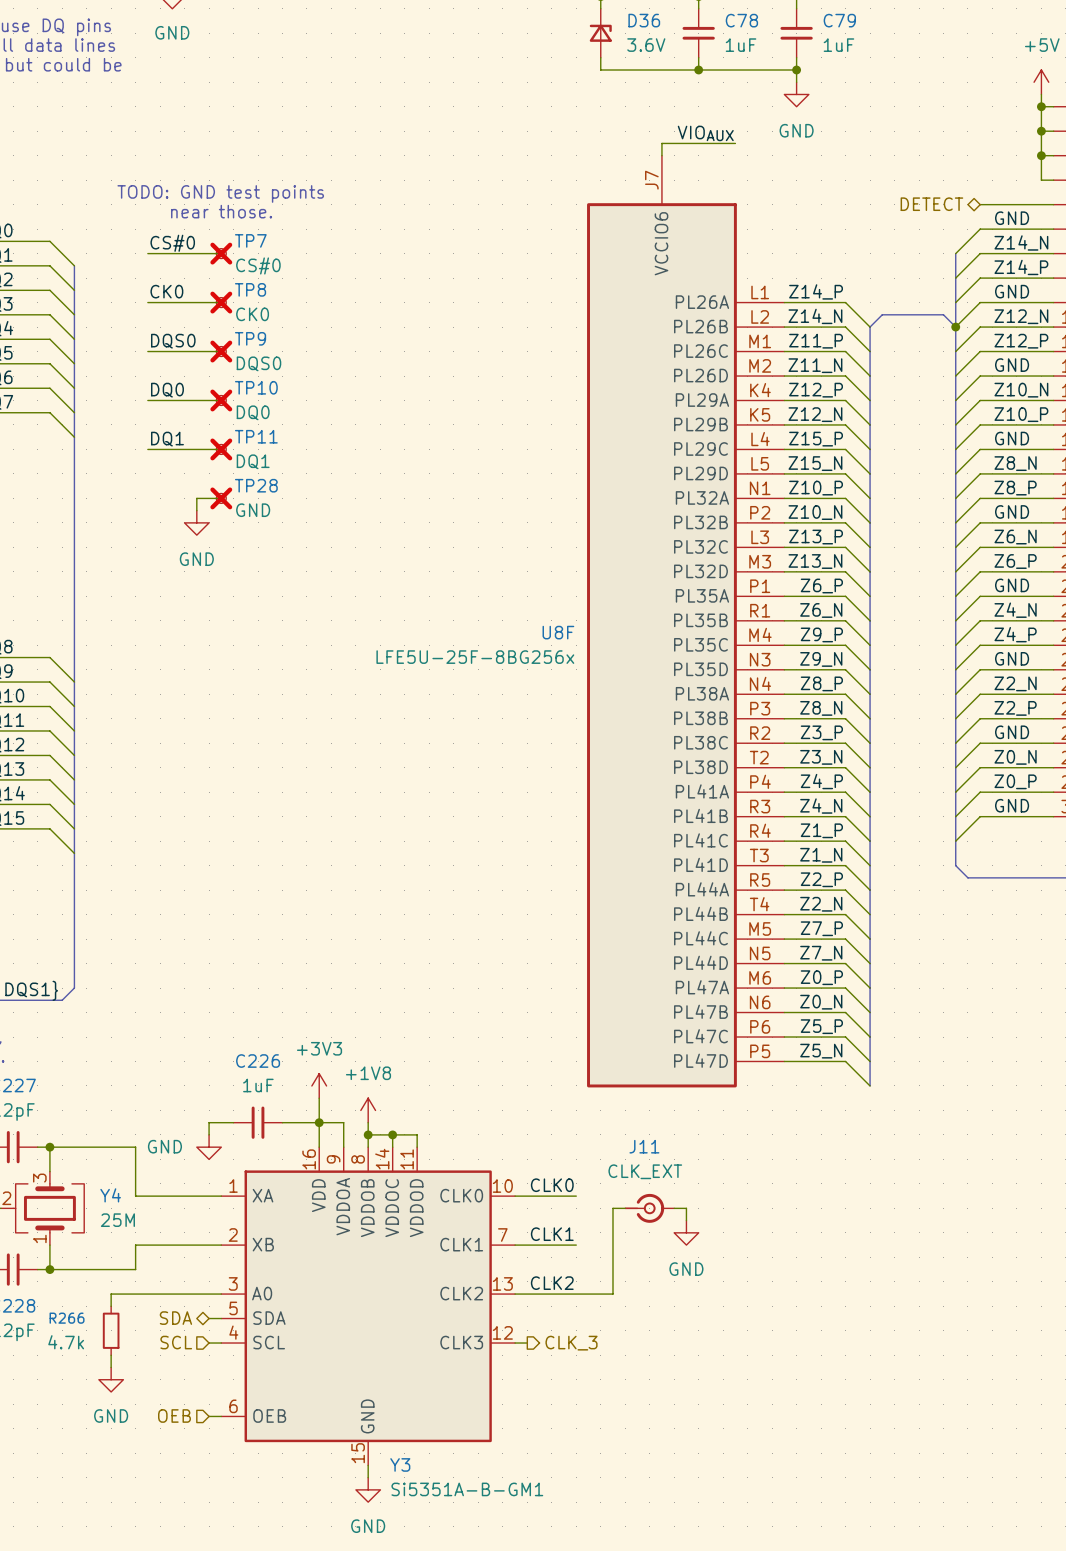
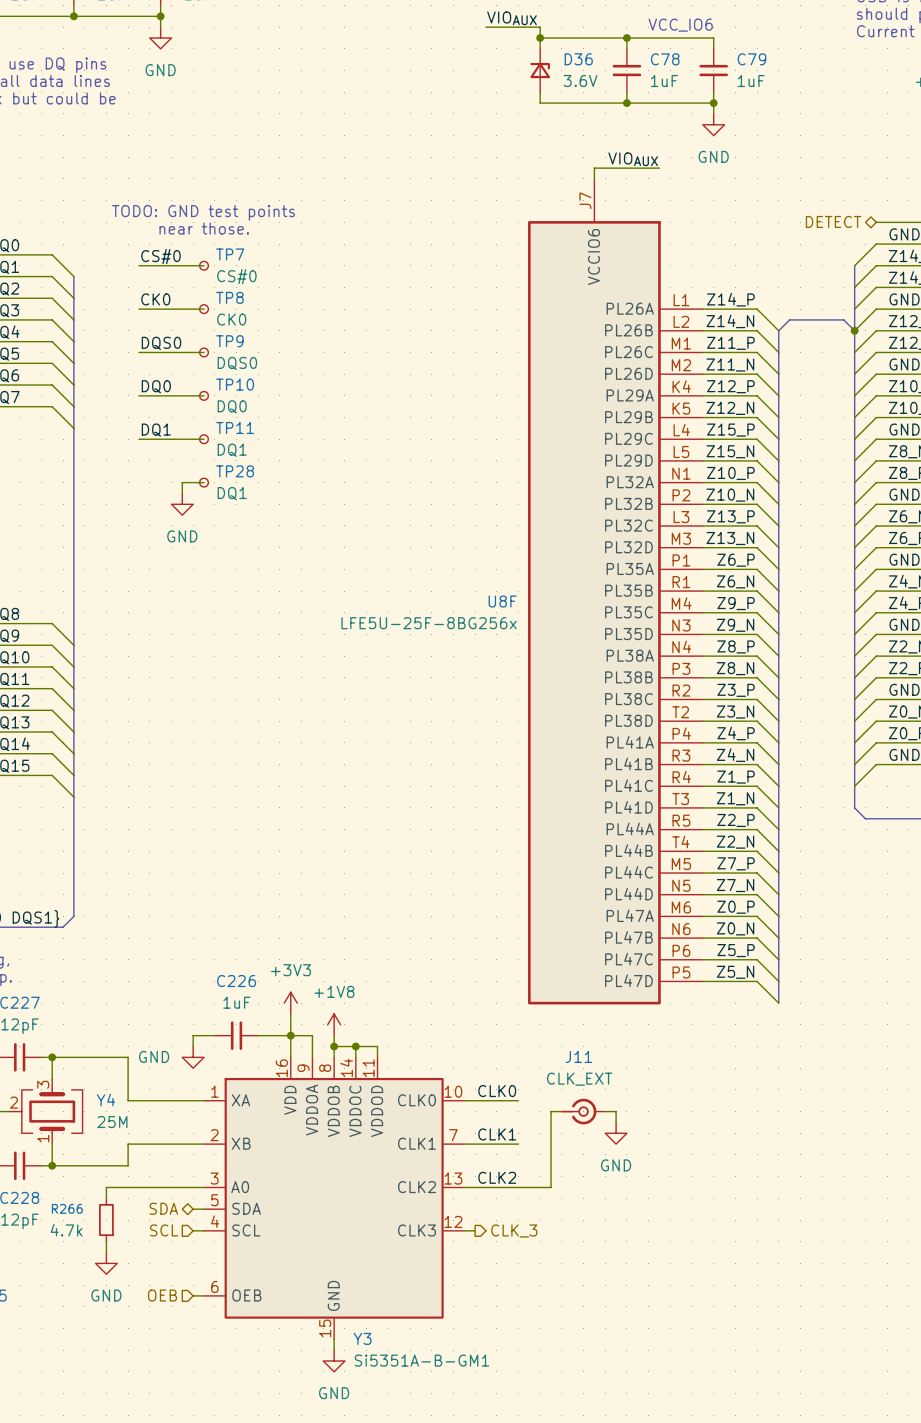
TP7 do-not-place cross: (221, 253) -> none
TP8 do-not-place cross: (221, 302) -> none
TP9 do-not-place cross: (221, 351) -> none
TP10 do-not-place cross: (221, 400) -> none
TP11 do-not-place cross: (221, 449) -> none
TP28 do-not-place cross: (221, 498) -> none
TP28 value: GND (253, 510) -> DQ1 (232, 493)

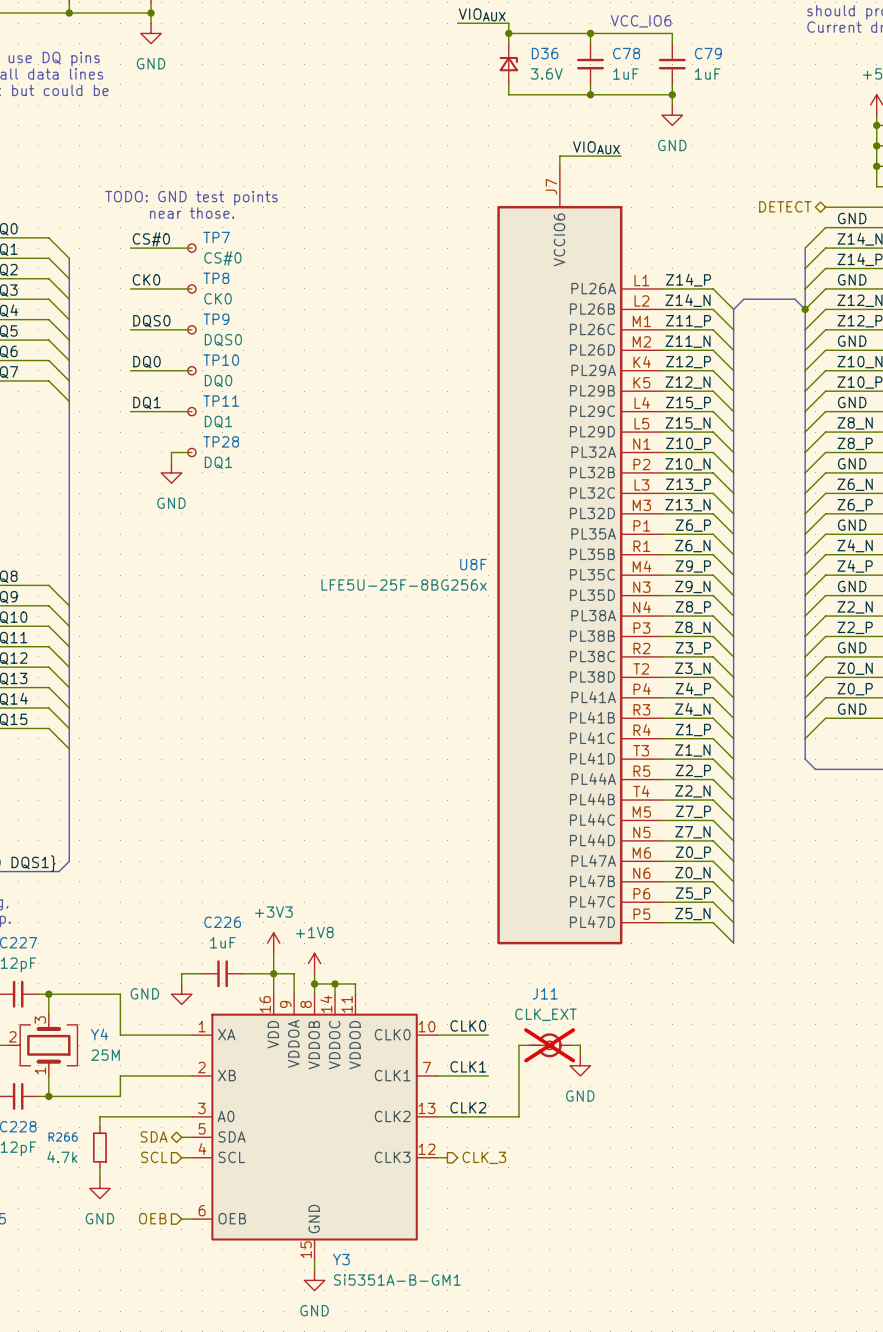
J11 do-not-place cross: none -> (549, 1045)

